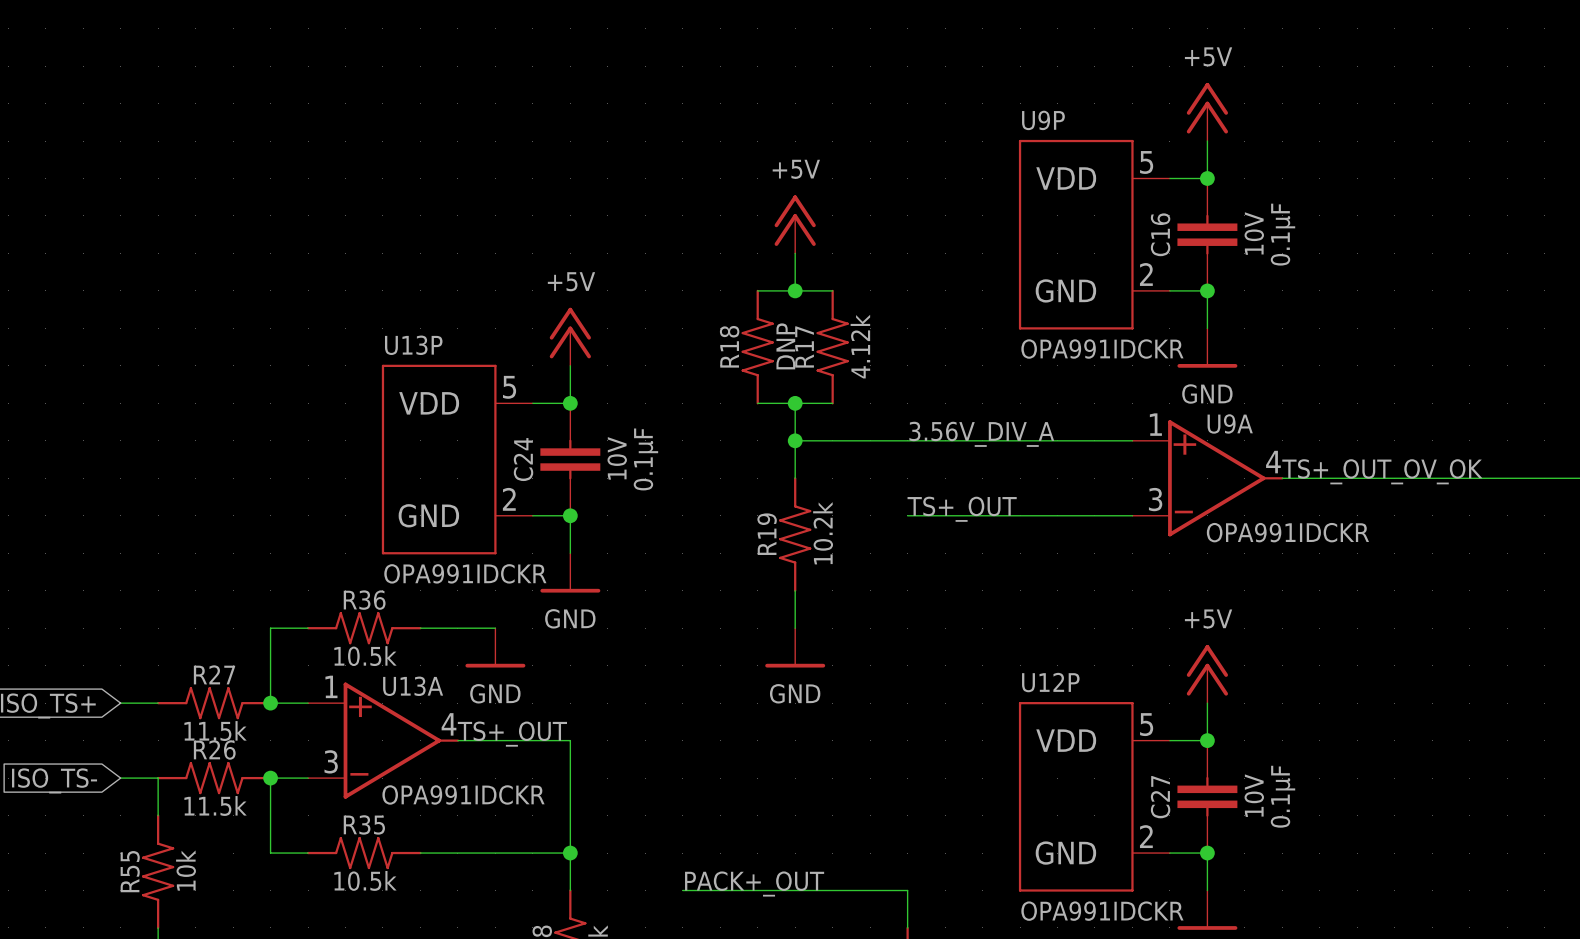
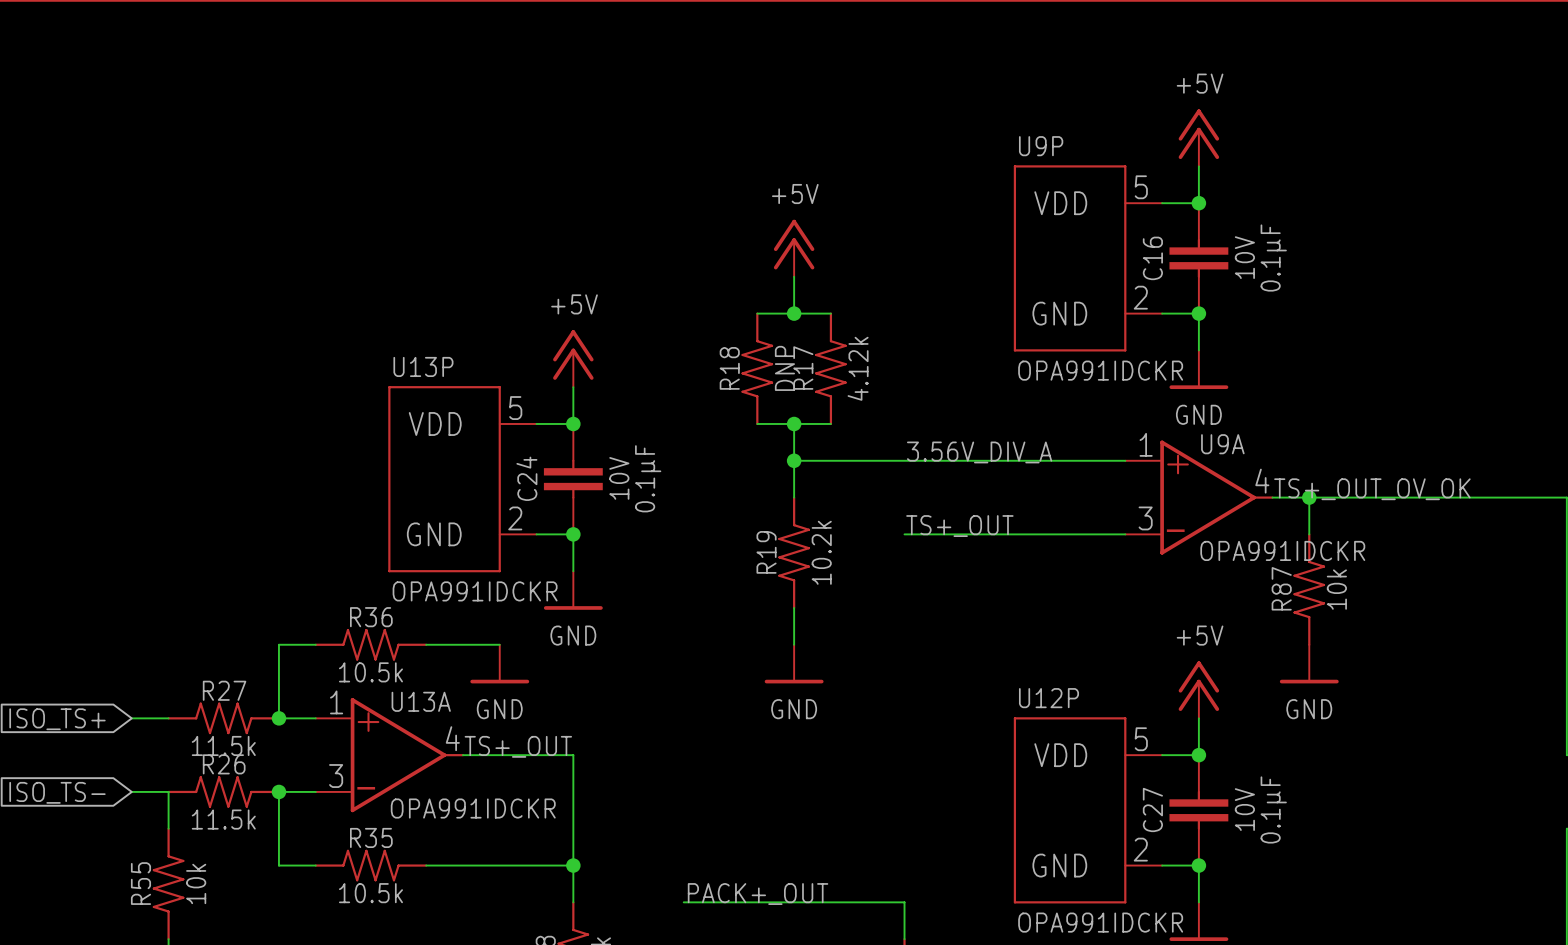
wire: none -> (1309, 497) (1309, 534)
junction: none -> (1309, 497)
R87: none -> (1309, 589)
power symbol: none -> GND (1309, 664)

